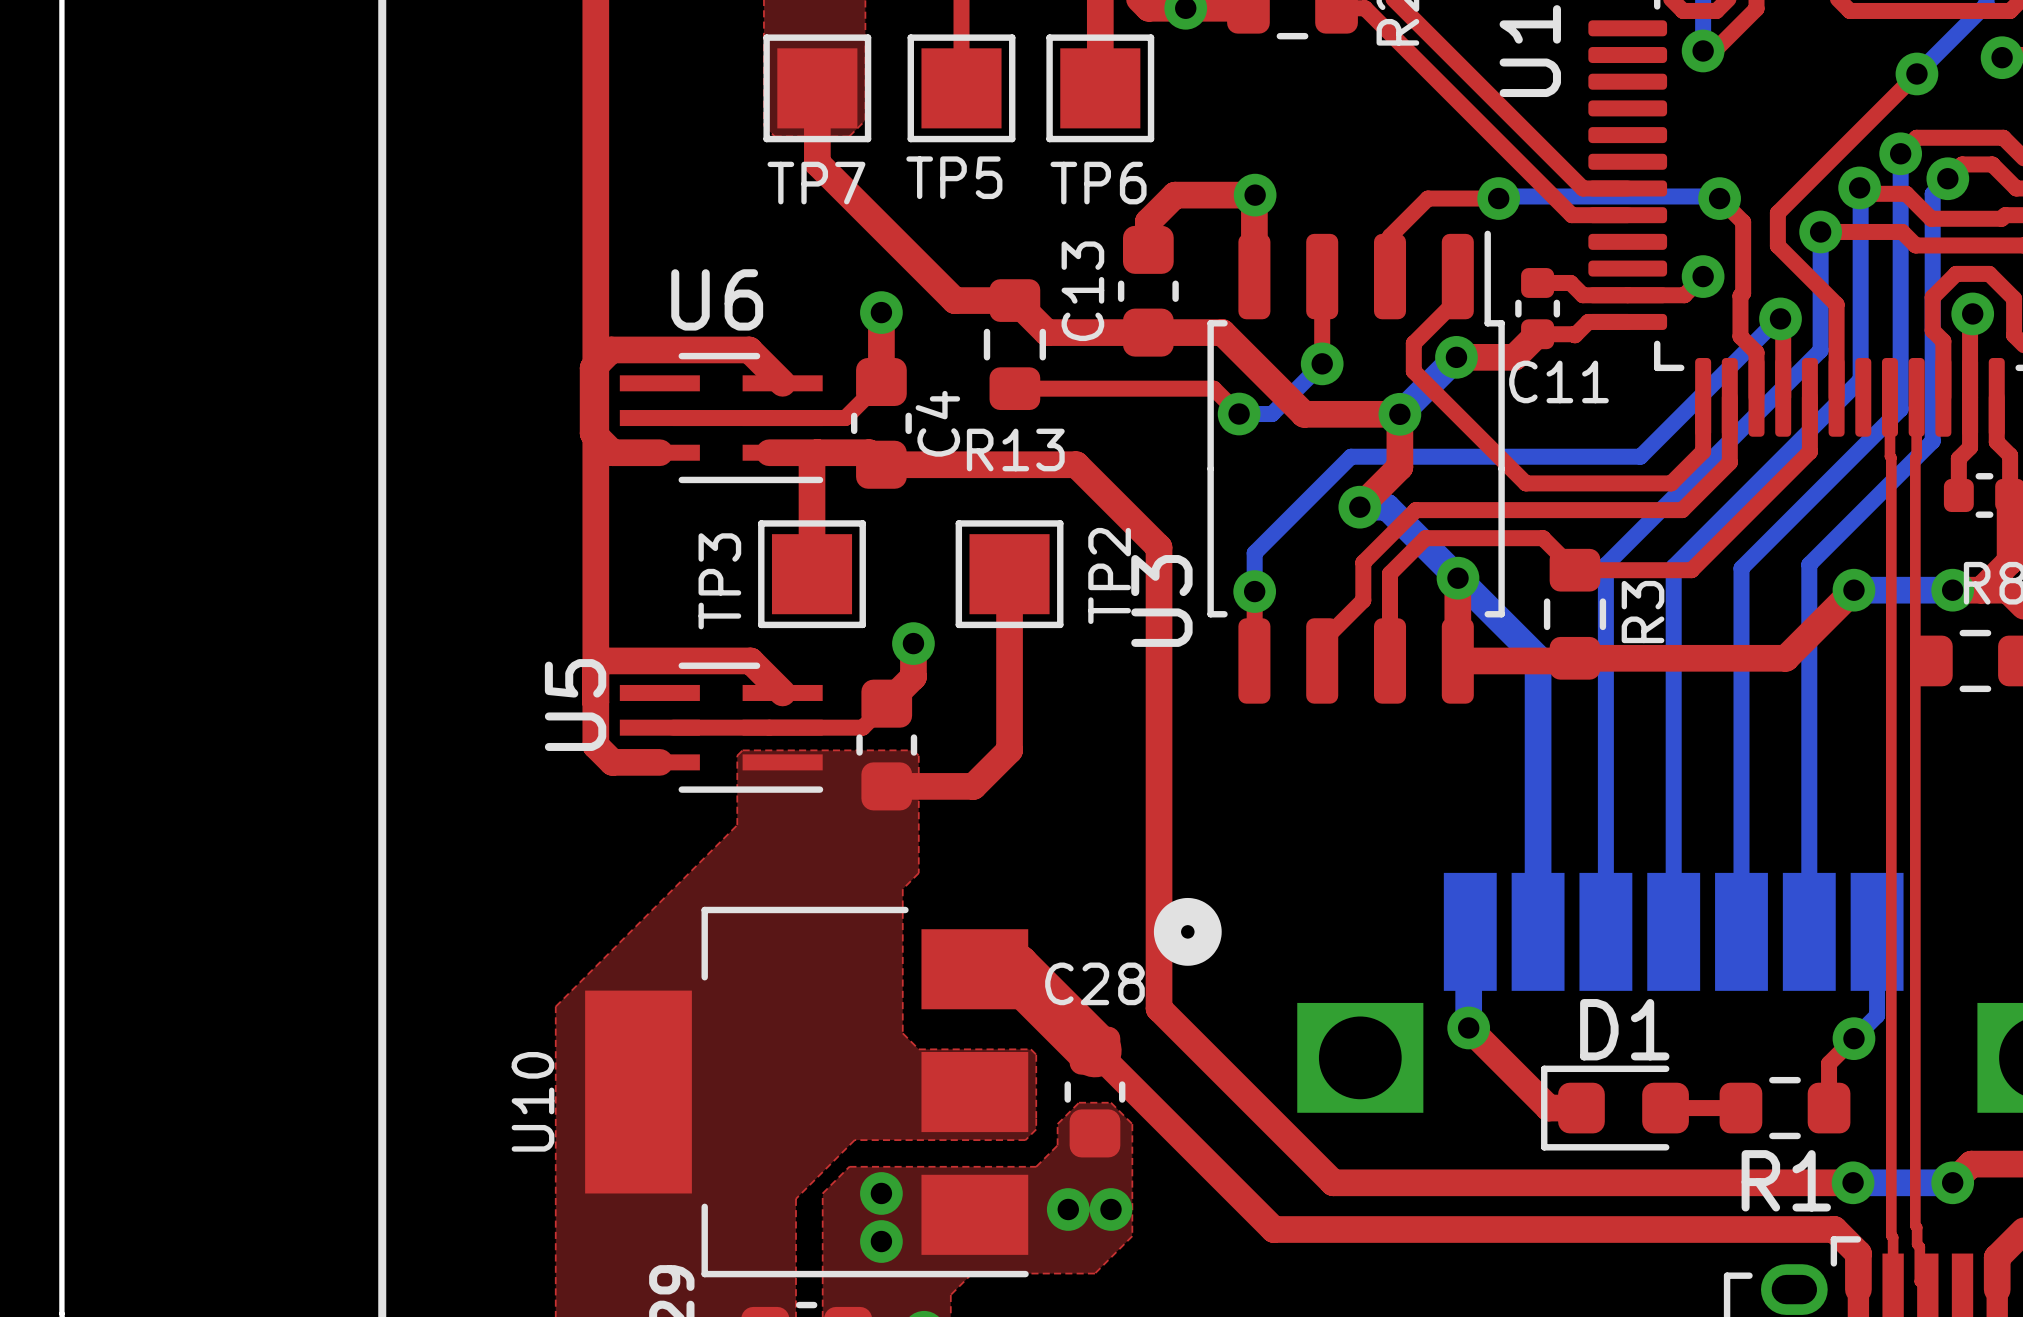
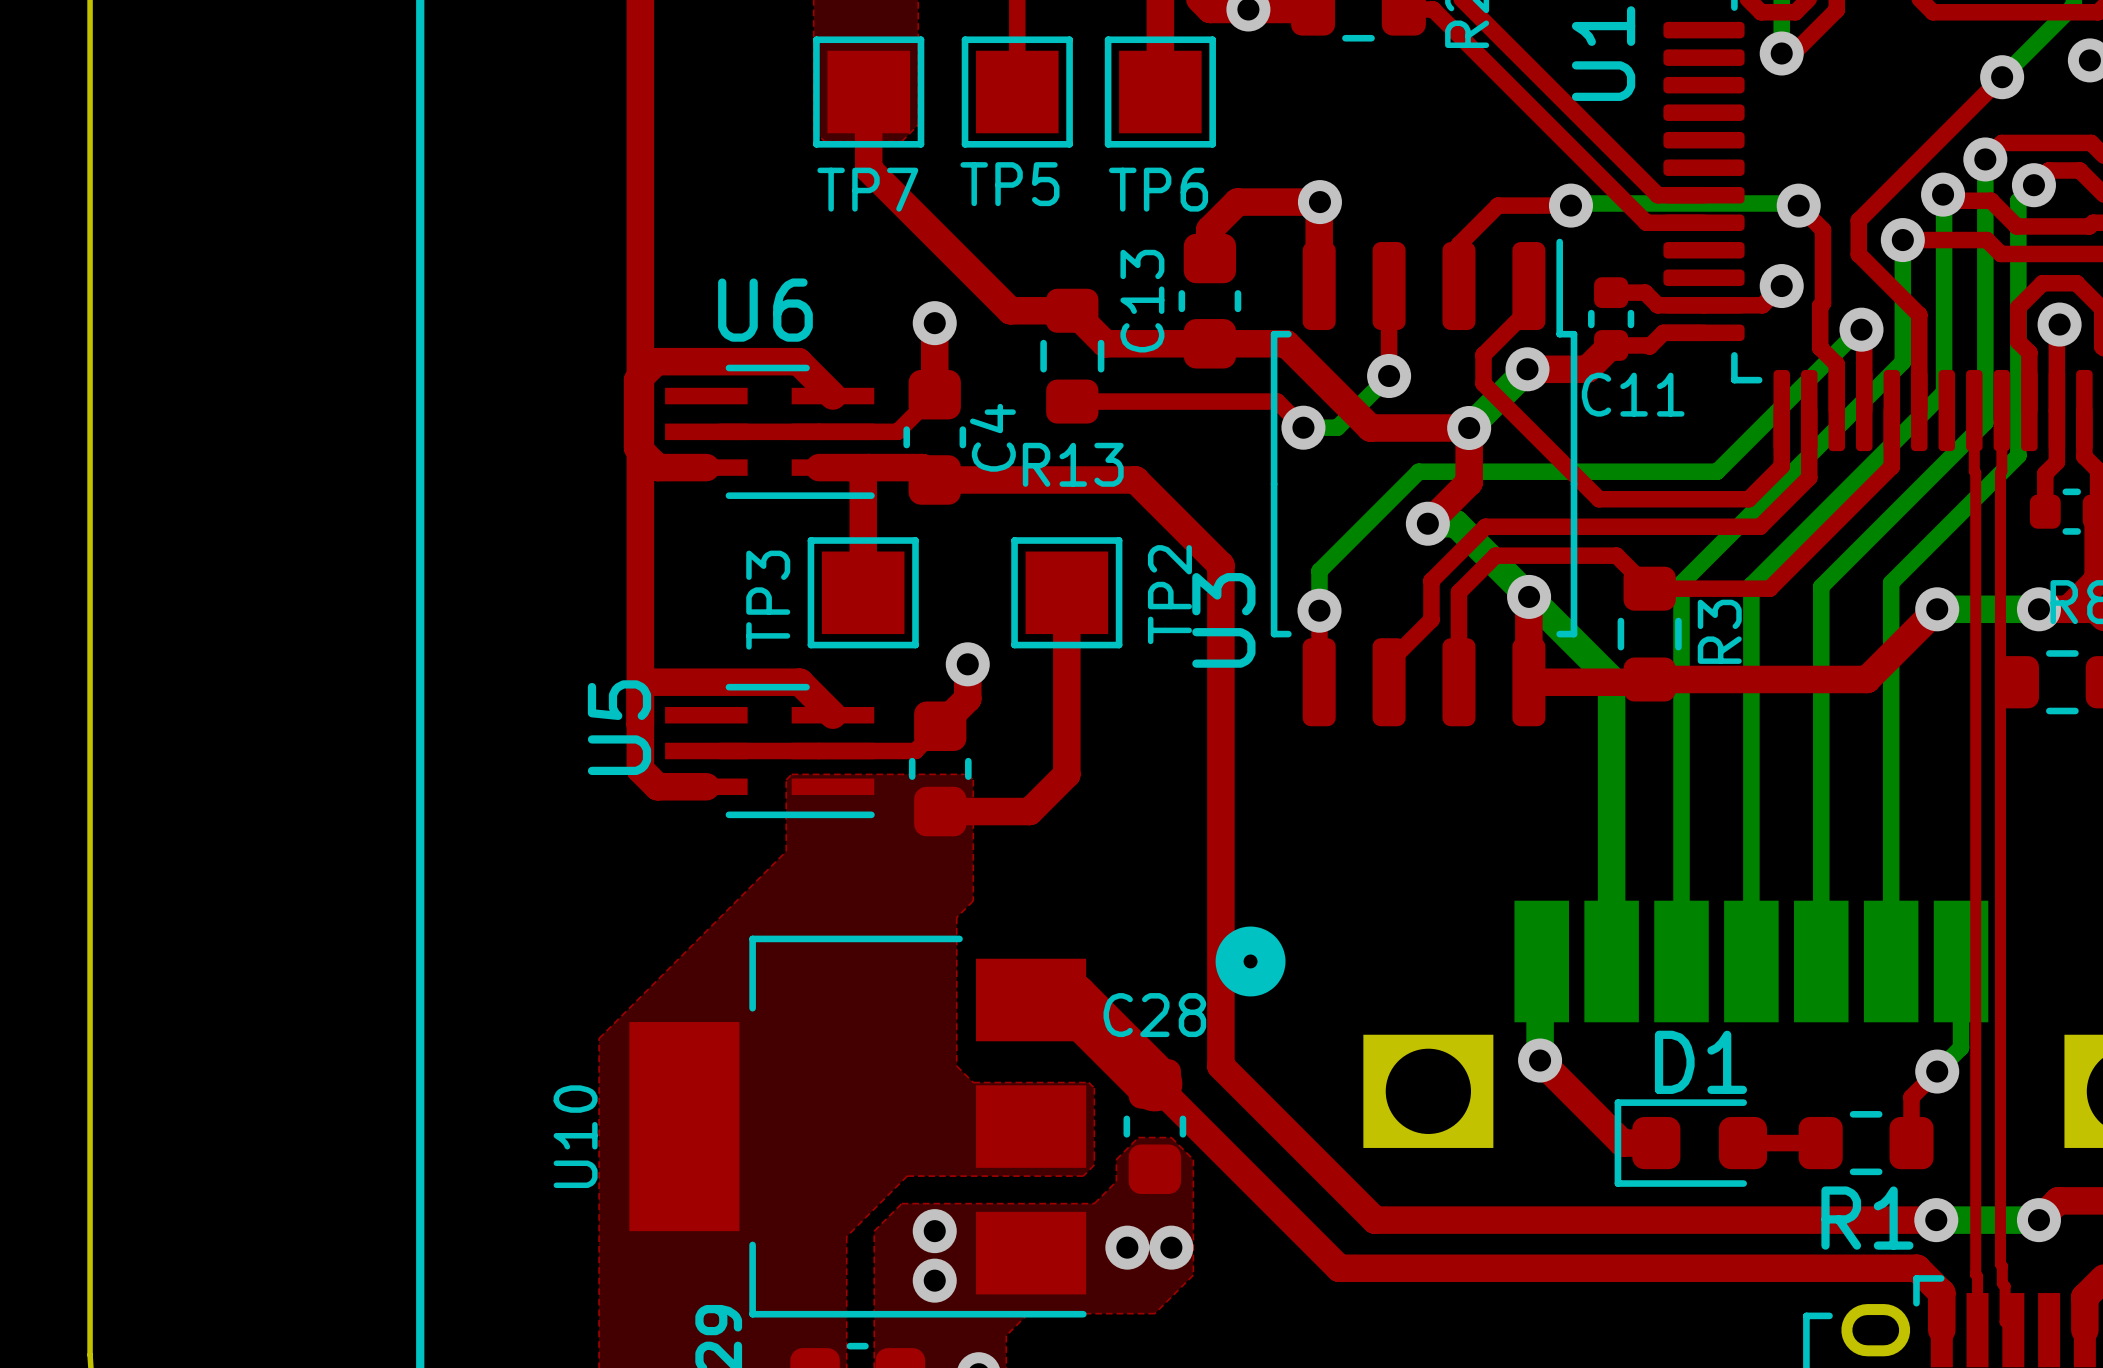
top track: (1159, 1008) (1333, 1182) -> (1220, 1040) (1220, 1066) (1374, 1220) (1400, 1220)

